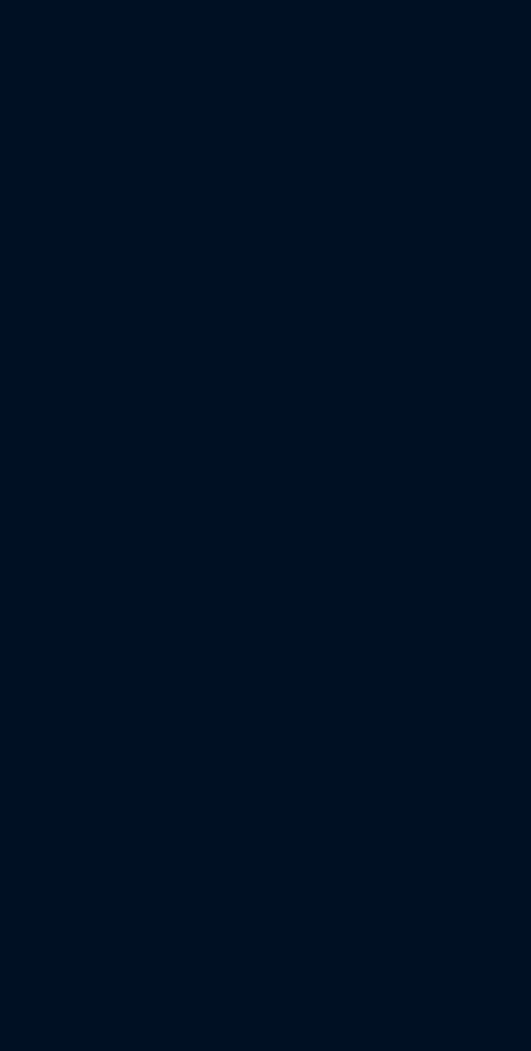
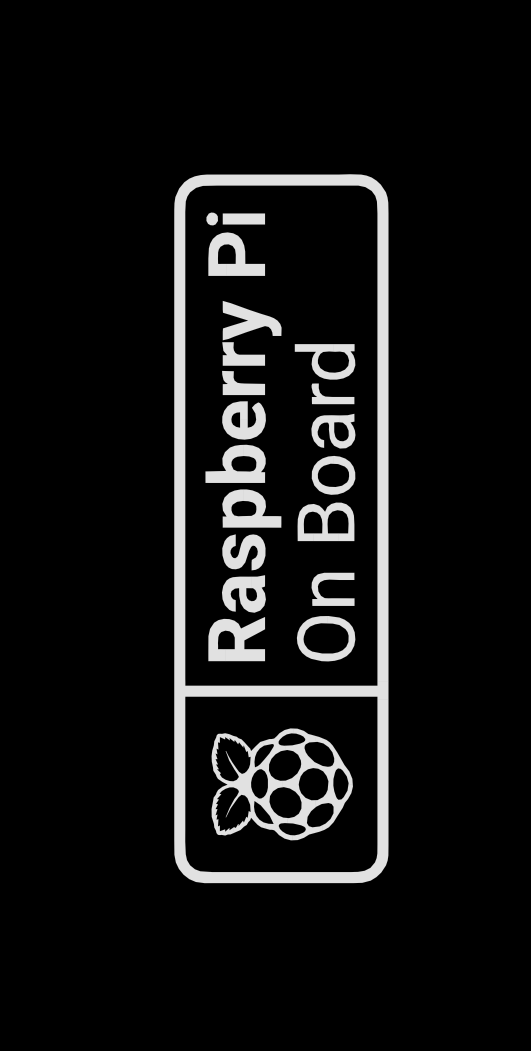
drawing: none -> [174, 174, 389, 884]

